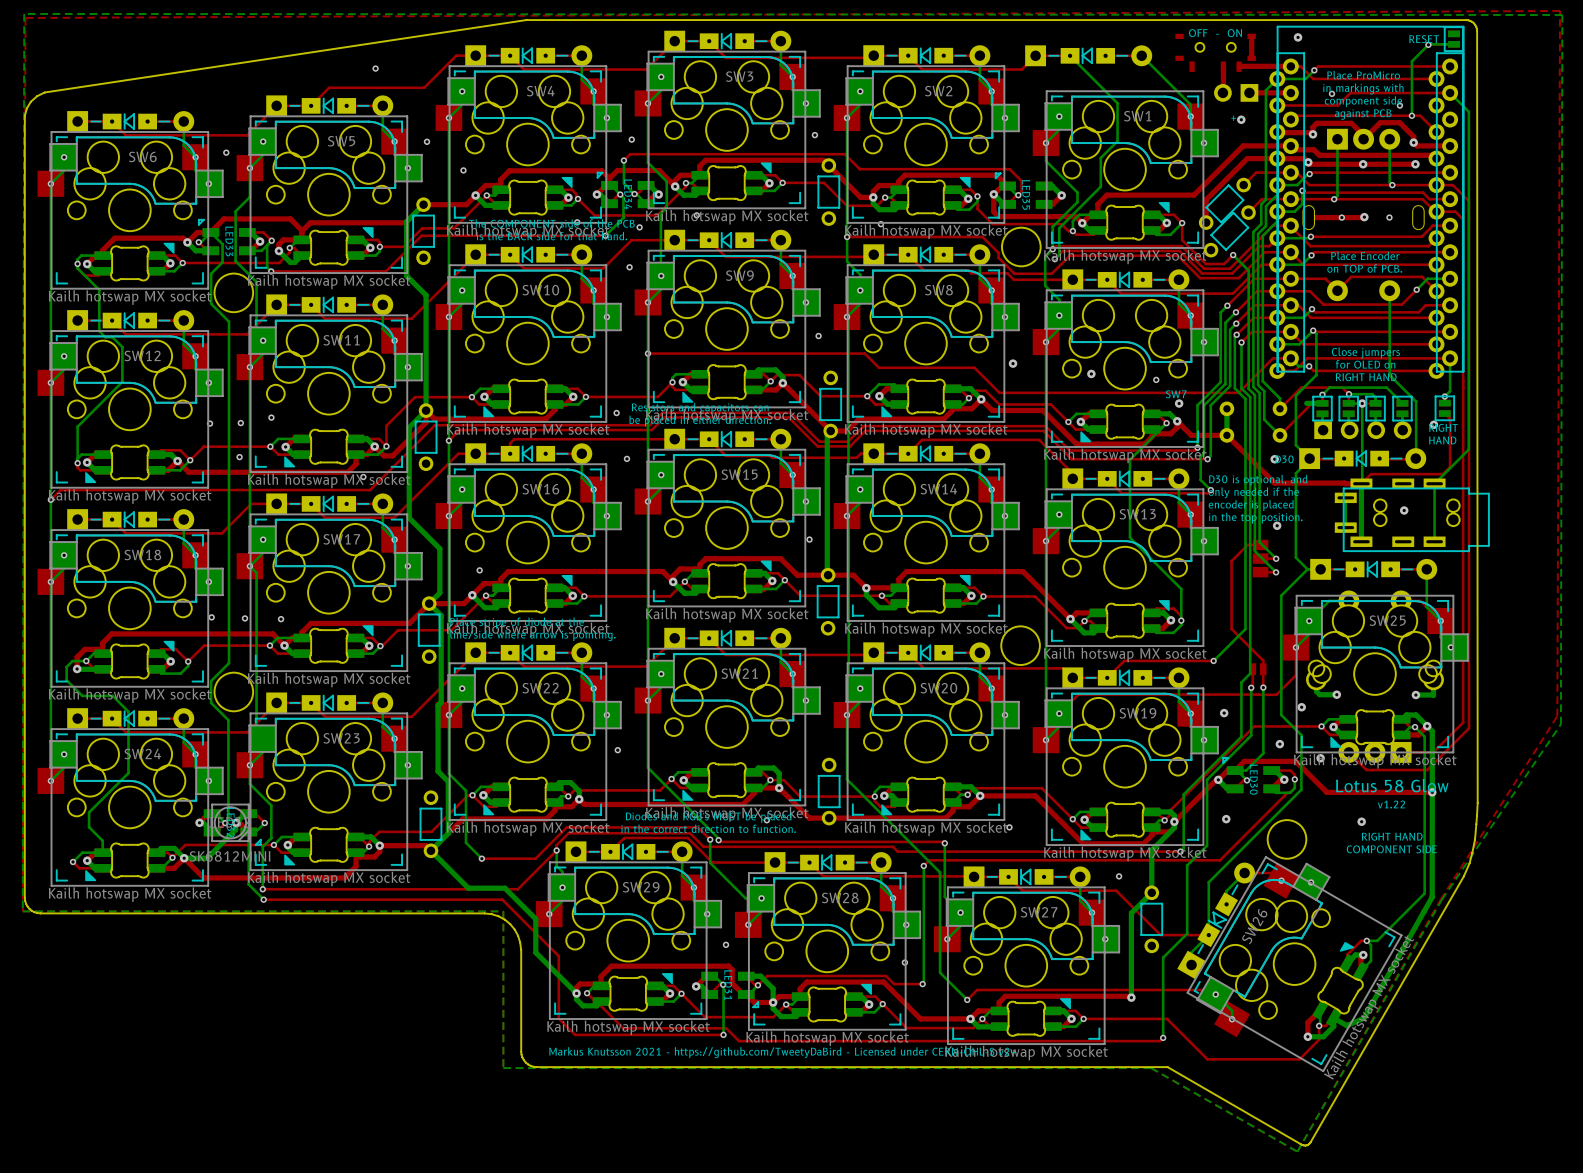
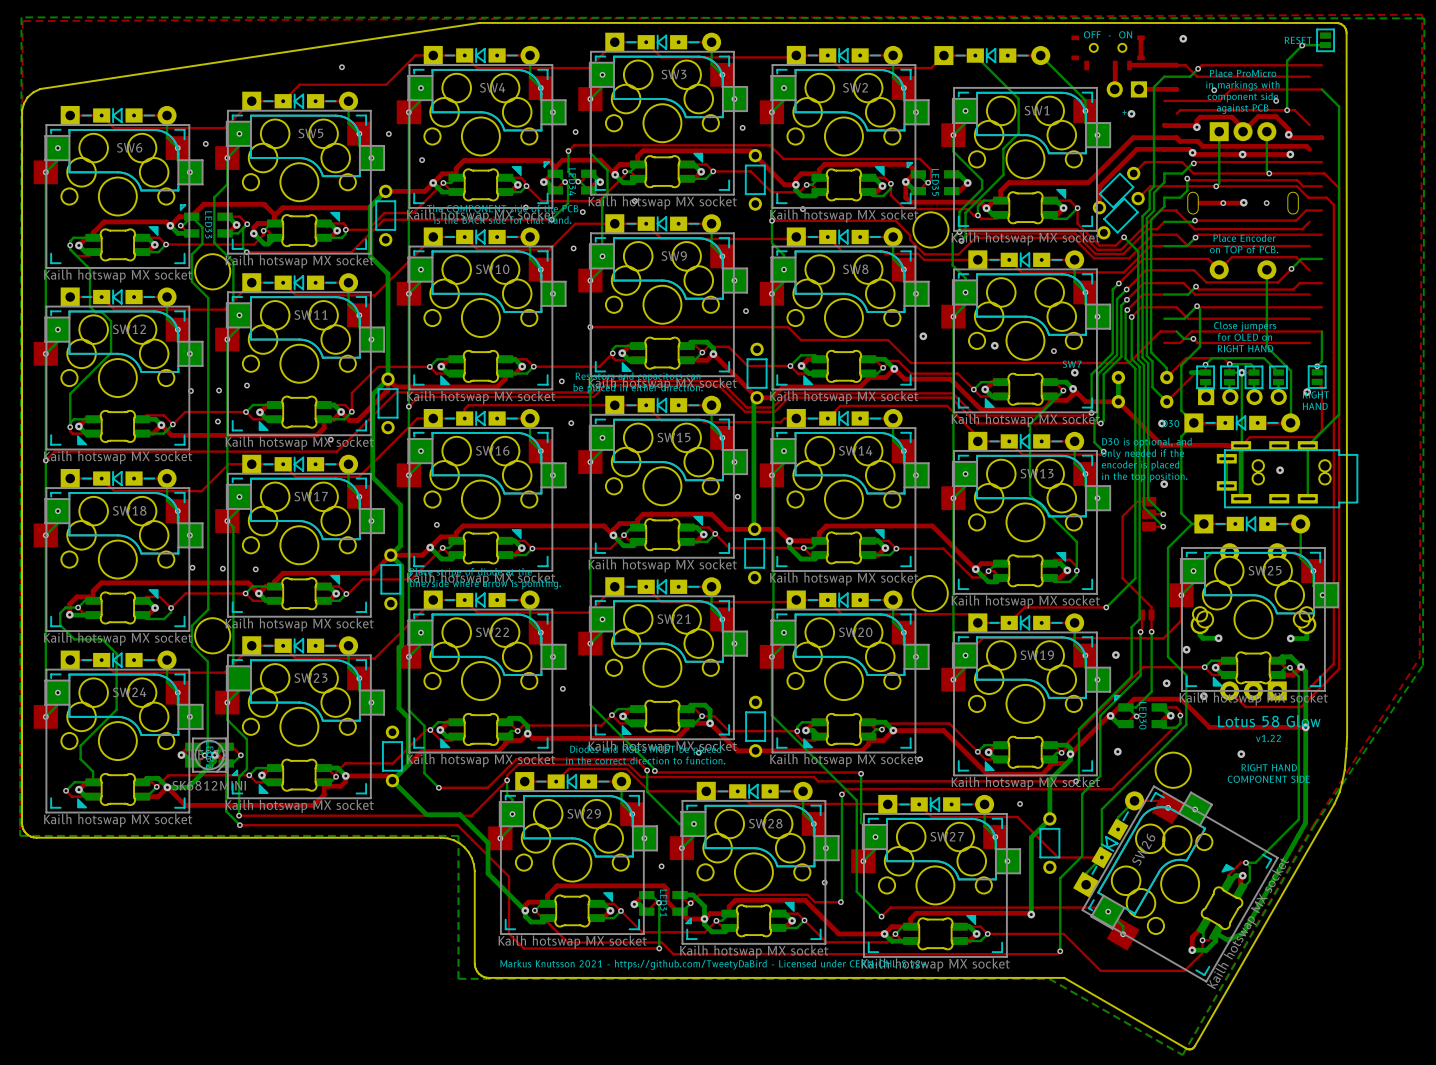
part: (1366, 202) -> none

